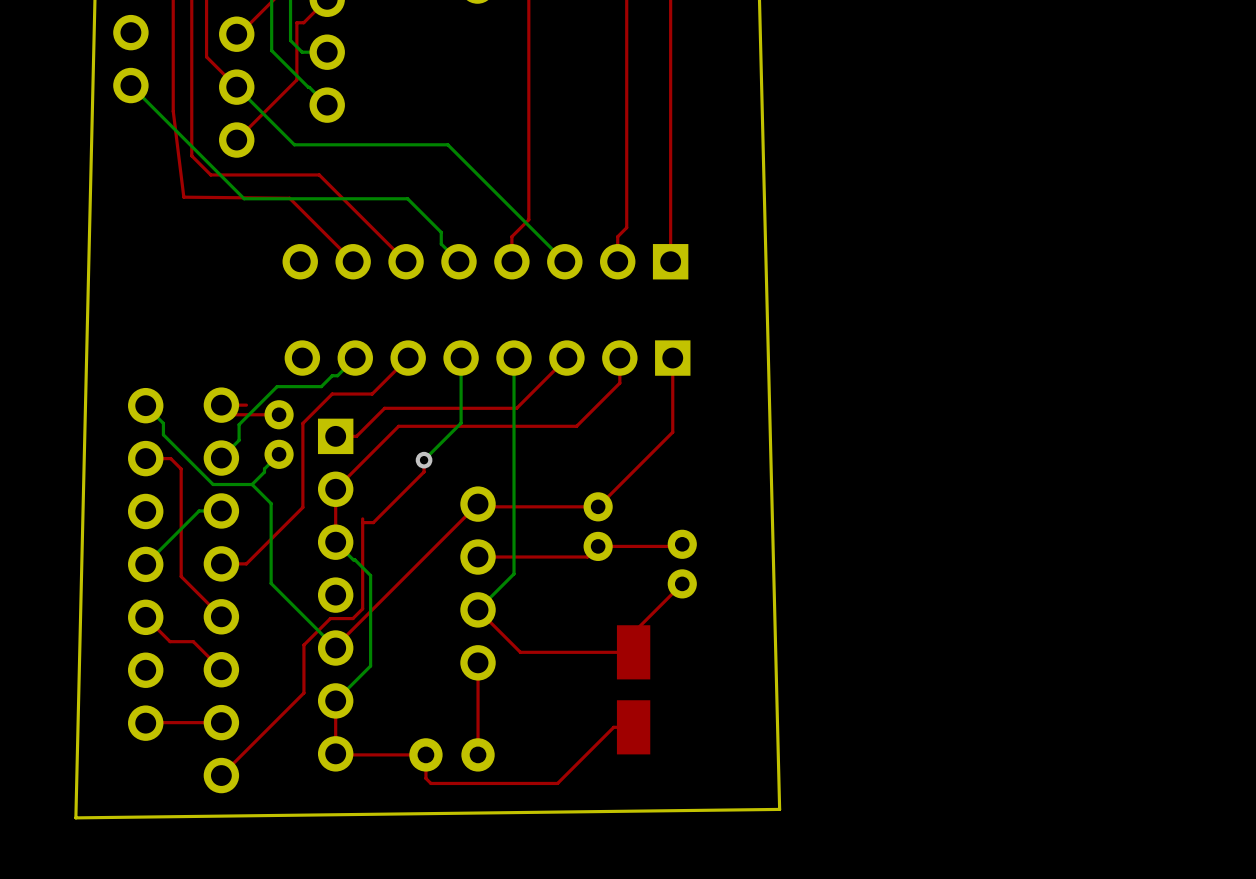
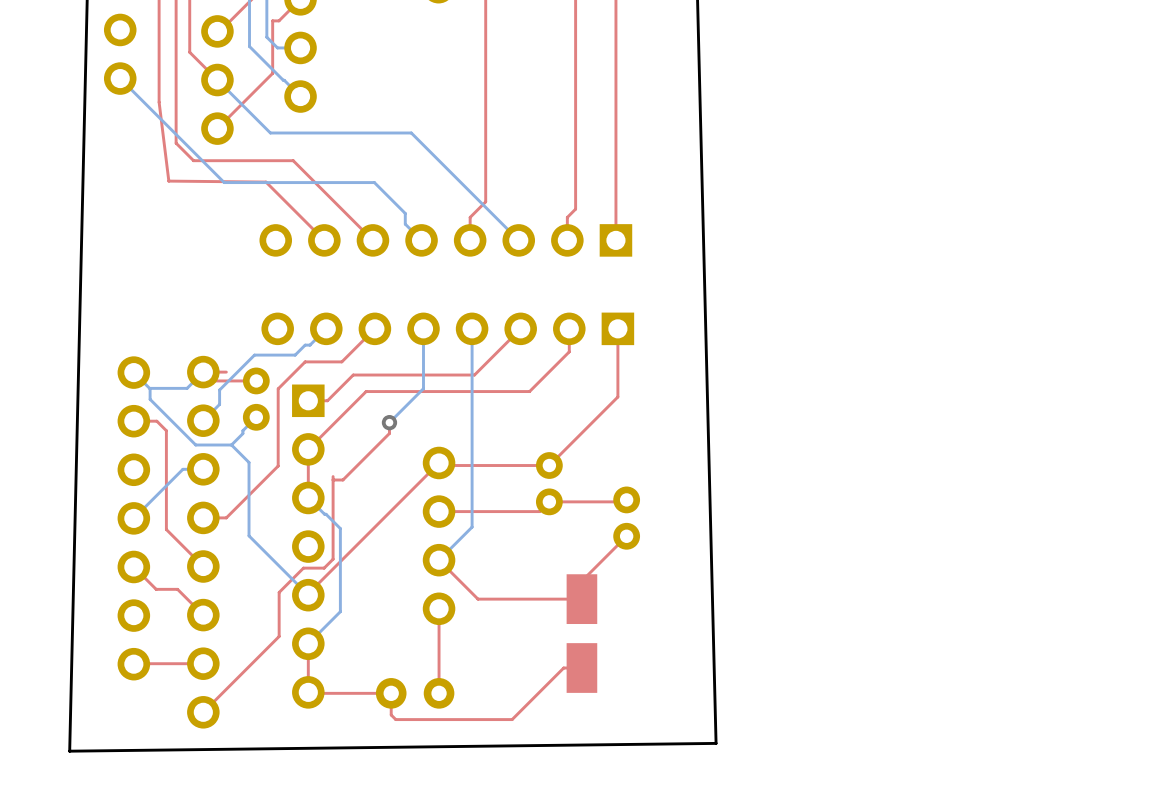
bottom track: none -> (203, 372) (187, 388) (150, 388)

